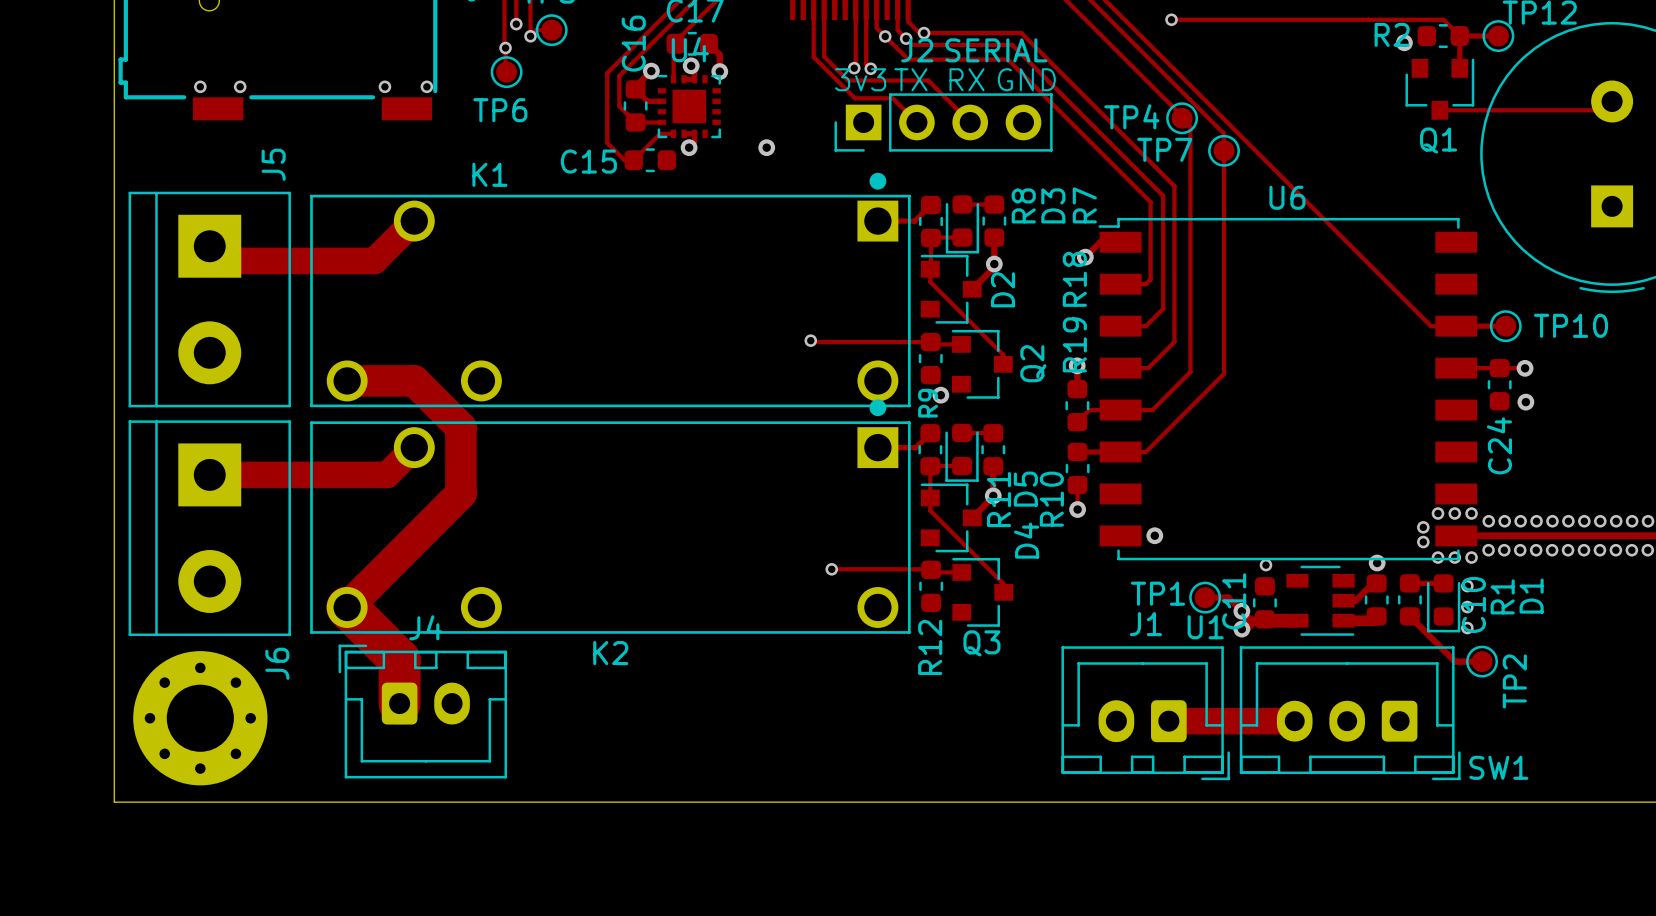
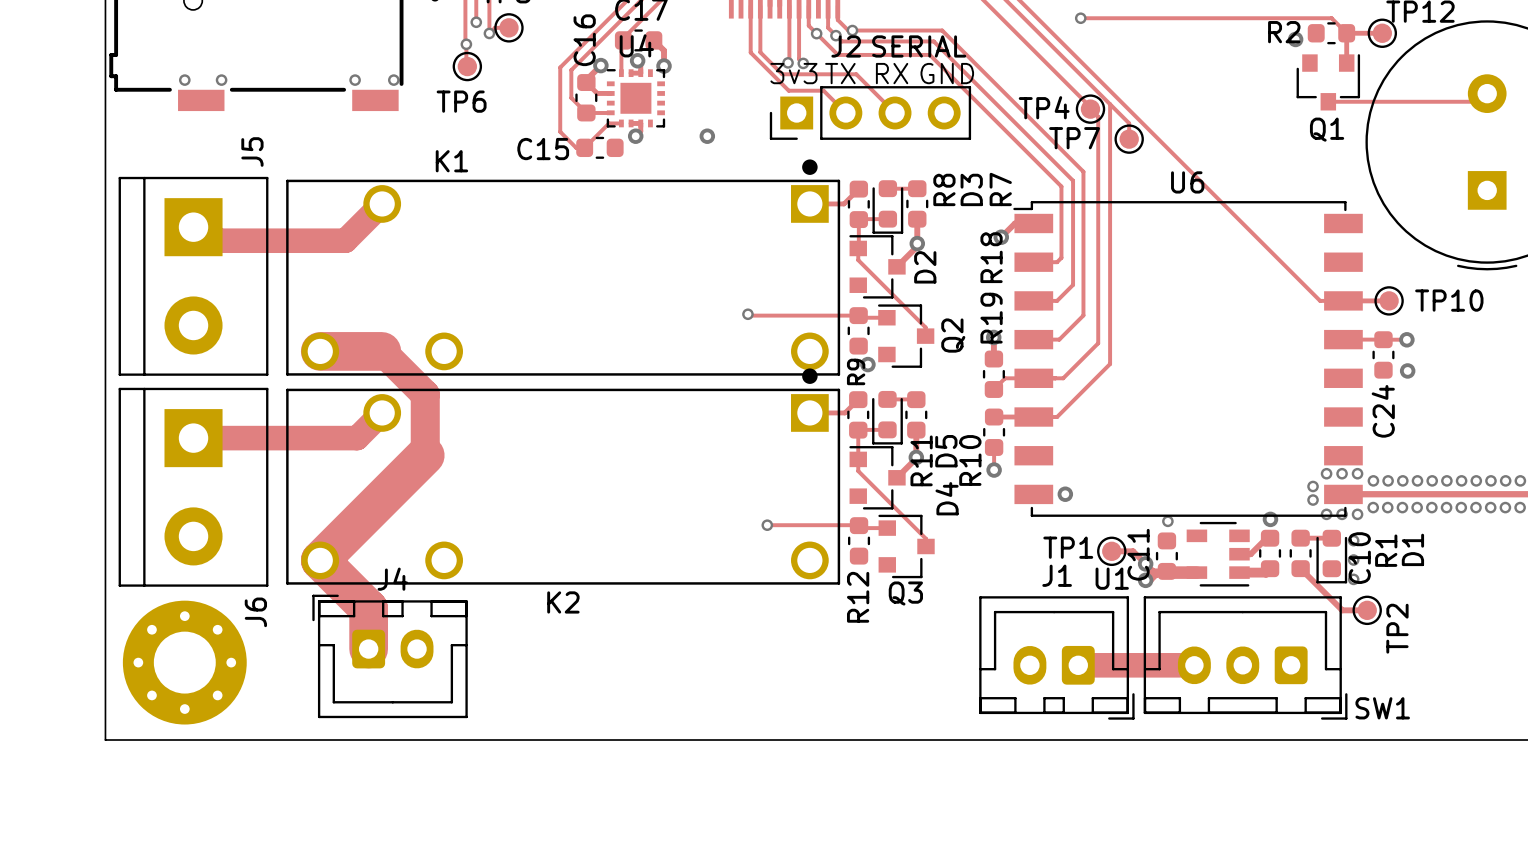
track: (1224, 150) (1224, 373) (1203, 394) -> (1110, 104) (1110, 364)
track width: thin (347, 380) (414, 380) -> thick (320, 351) (382, 351)
track width: thin (460, 493) (347, 607) -> thick (425, 455) (320, 560)

